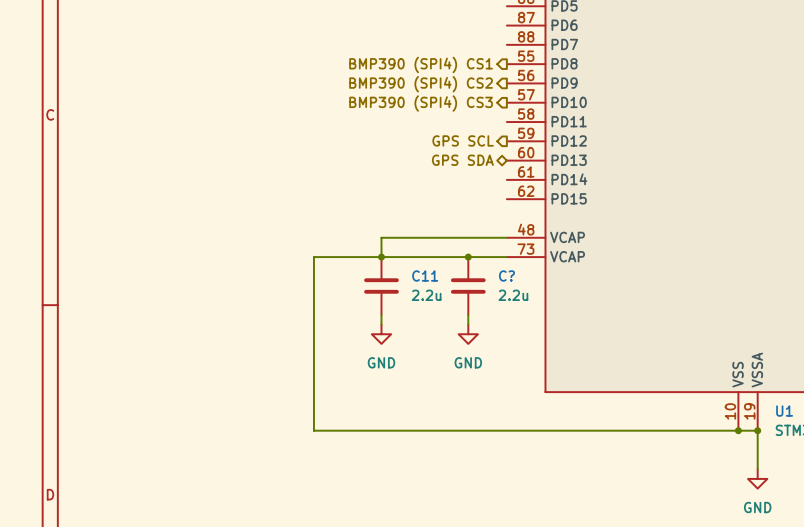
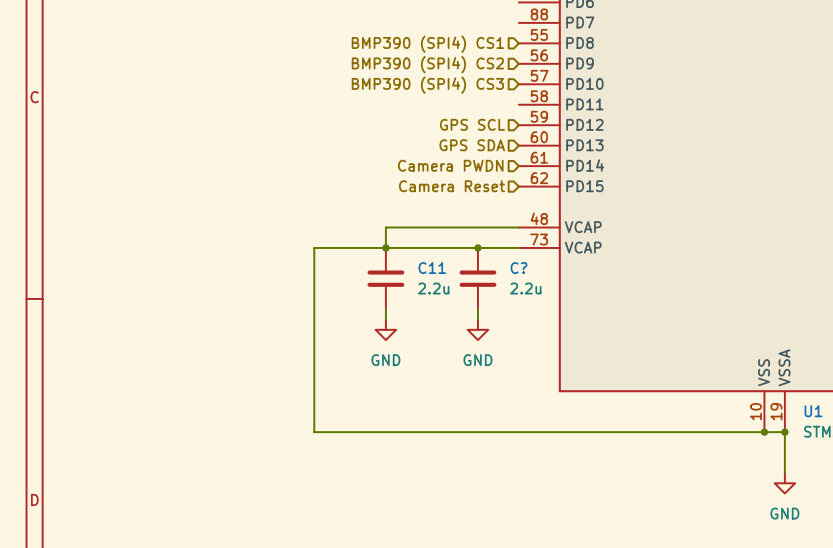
hierarchical label shape: output (421, 64) -> input (427, 44)
hierarchical label shape: output (421, 84) -> input (427, 64)
hierarchical label shape: output (421, 103) -> input (427, 85)
hierarchical label shape: output (463, 140) -> input (472, 124)
hierarchical label shape: bidirectional (462, 160) -> input (472, 145)
hierarchical label: none -> Camera PWDN (450, 165)
hierarchical label: none -> Camera Reset (451, 186)

